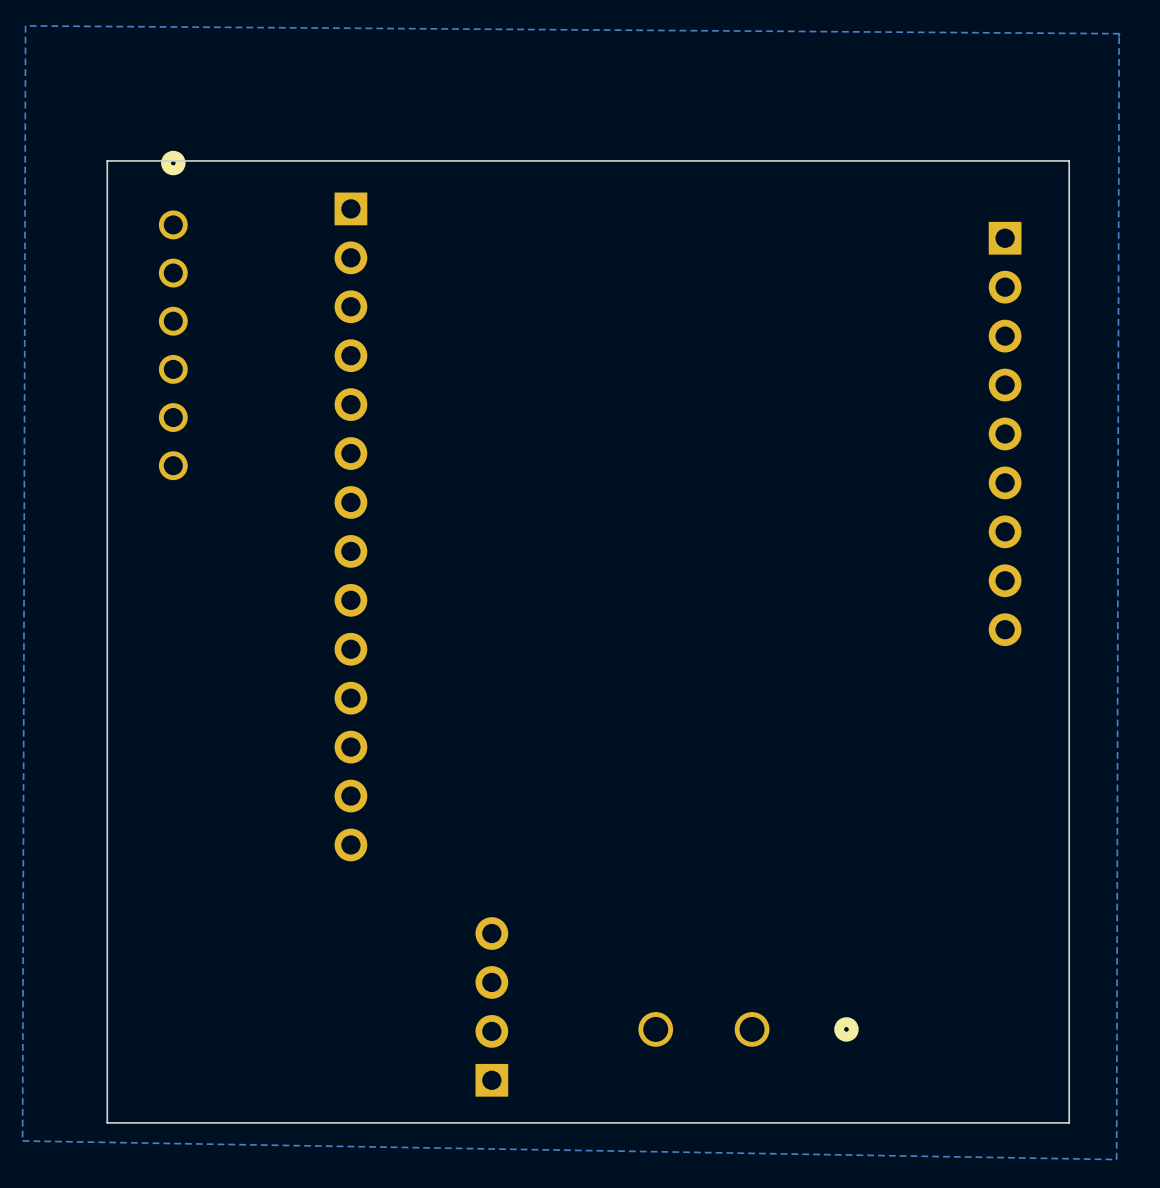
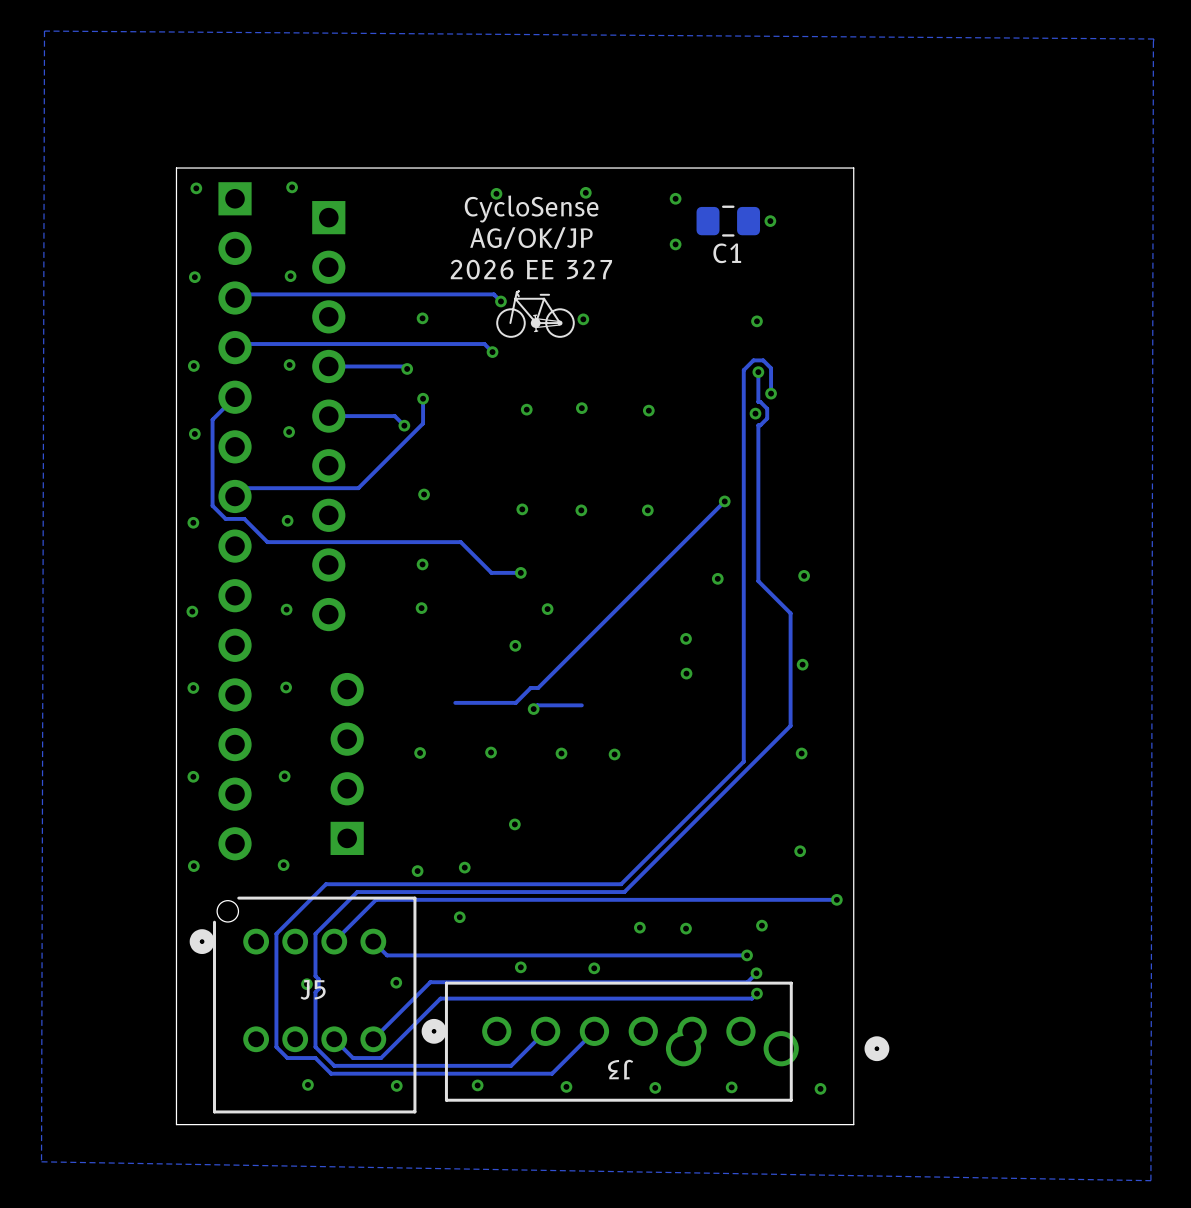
board edge: (823, 160) (1069, 160) (1069, 1122) (107, 1122) (107, 160) (155, 160) -> (853, 168) (853, 1124) (176, 1124) (176, 168)
via: none -> (292, 187)
via: none -> (196, 188)
via: none -> (585, 192)
via: none -> (496, 193)
via: none -> (675, 198)
text: none -> CycloSense (531, 209)
C1: none -> (728, 221)
via: none -> (770, 221)
text: none -> AG/OK/JP (531, 238)
via: none -> (675, 244)
text: none -> 2026 EE 327 (531, 269)
via: none -> (290, 276)
via: none -> (194, 277)
line: none -> (518, 291) (515, 298)
line: none -> (516, 292) (518, 296)
line: none -> (549, 294) (540, 294)
track: none -> (235, 298) (238, 294) (493, 294) (500, 301)
line: none -> (515, 298) (536, 323)
line: none -> (515, 298) (510, 323)
line: none -> (544, 298) (560, 323) (535, 323) (536, 331)
line: none -> (544, 298) (535, 323)
line: none -> (544, 298) (515, 298)
via: none -> (500, 301)
drawing: none -> [496, 308, 575, 338]
line: none -> (536, 315) (533, 315)
line: none -> (535, 316) (535, 318) (560, 321)
via: none -> (422, 318)
via: none -> (583, 319)
via: none -> (756, 321)
part: (173, 315) -> none
line: none -> (559, 325) (535, 327)
line: none -> (537, 331) (534, 331)
track: none -> (235, 347) (238, 344) (484, 344) (492, 352)
via: none -> (492, 352)
via: none -> (289, 364)
via: none -> (193, 365)
track: none -> (328, 366) (404, 366) (407, 368)
via: none -> (407, 368)
track: none -> (758, 372) (758, 401) (767, 408) (767, 418) (758, 425) (758, 581) (790, 613) (790, 725) (624, 892) (357, 892) (315, 933) (315, 976) (318, 979) (318, 989) (315, 992) (315, 1047) (334, 1065) (511, 1065) (545, 1031)
via: none -> (758, 372)
track: none -> (771, 393) (771, 368) (763, 360) (753, 360) (743, 370) (743, 761) (621, 884) (326, 884) (276, 933) (276, 1047) (287, 1058) (315, 1058) (331, 1073) (552, 1073) (594, 1031)
via: none -> (771, 393)
track: none -> (235, 397) (212, 419) (212, 505) (225, 518) (244, 518) (267, 542) (460, 542) (491, 572) (520, 572)
track: none -> (423, 398) (423, 423) (358, 488) (243, 488) (235, 496)
via: none -> (423, 398)
via: none -> (581, 408)
via: none -> (526, 409)
via: none -> (648, 410)
via: none -> (755, 413)
track: none -> (328, 416) (394, 416) (404, 425)
part: none -> (328, 416)
via: none -> (404, 425)
via: none -> (289, 431)
via: none -> (194, 433)
part: (1005, 433) -> none
via: none -> (424, 494)
track: none -> (724, 501) (538, 687) (530, 687) (515, 702) (455, 702)
via: none -> (724, 501)
via: none -> (522, 509)
via: none -> (581, 510)
via: none -> (647, 510)
via: none -> (287, 520)
via: none -> (193, 522)
part position: (350, 526) -> (235, 521)
via: none -> (422, 564)
via: none -> (520, 572)
via: none -> (804, 575)
via: none -> (717, 578)
via: none -> (421, 608)
via: none -> (547, 609)
via: none -> (286, 609)
via: none -> (192, 611)
via: none -> (686, 638)
via: none -> (515, 645)
via: none -> (802, 664)
via: none -> (686, 673)
via: none -> (193, 687)
via: none -> (286, 687)
track: none -> (581, 705) (537, 705) (533, 709)
via: none -> (533, 709)
via: none -> (420, 752)
via: none -> (491, 752)
via: none -> (561, 753)
via: none -> (801, 753)
via: none -> (614, 754)
via: none -> (284, 776)
via: none -> (193, 776)
via: none -> (514, 824)
via: none -> (800, 851)
via: none -> (283, 865)
via: none -> (193, 866)
via: none -> (464, 867)
via: none -> (417, 871)
track: none -> (836, 899) (376, 899) (334, 941)
via: none -> (836, 899)
via: none -> (459, 917)
via: none -> (761, 925)
via: none -> (639, 927)
via: none -> (686, 928)
track: none -> (373, 941) (387, 955) (747, 955)
via: none -> (747, 955)
via: none -> (520, 967)
via: none -> (594, 968)
track: none -> (756, 973) (747, 982) (430, 982) (373, 1039)
via: none -> (756, 973)
via: none -> (396, 982)
via: none -> (306, 984)
track: none -> (756, 993) (752, 998) (440, 998) (381, 1058) (353, 1058) (334, 1039)
via: none -> (756, 993)
J5: none -> (303, 1005)
part position: (491, 1006) -> (347, 763)
J3: none -> (607, 1041)
via: none -> (307, 1084)
via: none -> (477, 1085)
via: none -> (396, 1085)
via: none -> (566, 1086)
via: none -> (731, 1087)
via: none -> (655, 1087)
via: none -> (820, 1088)

